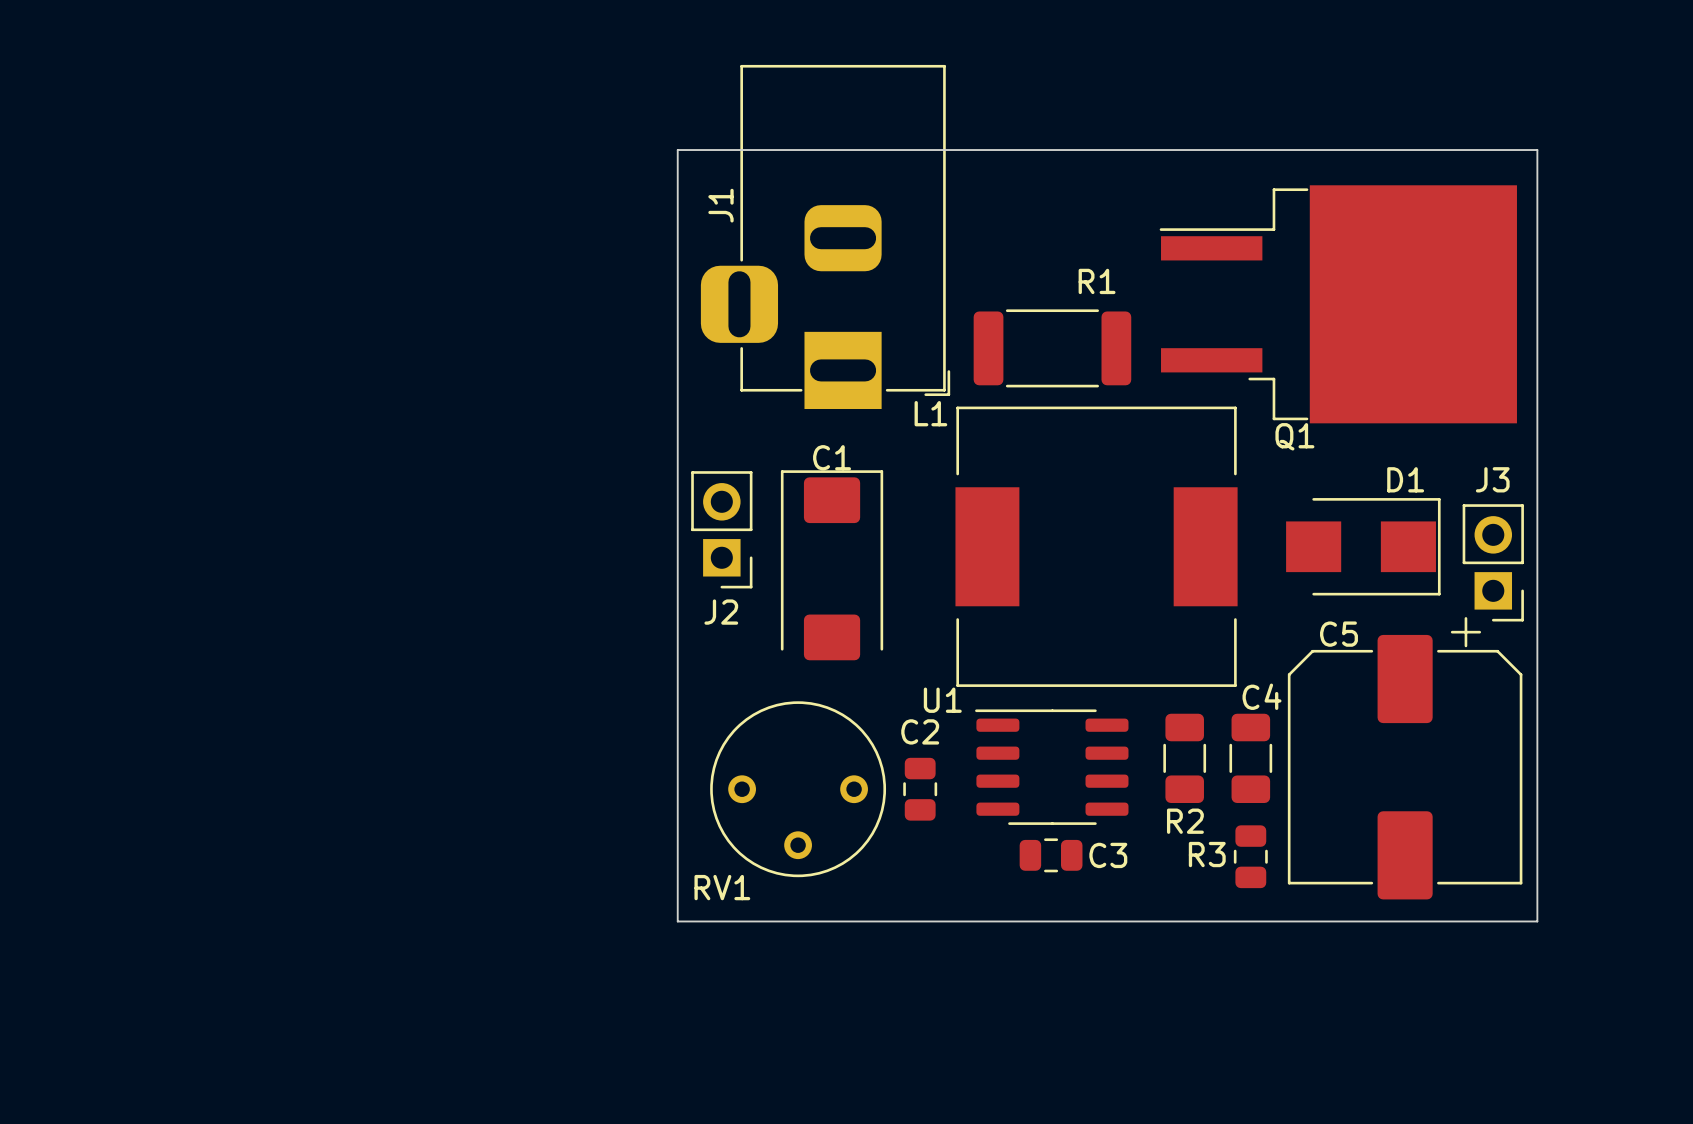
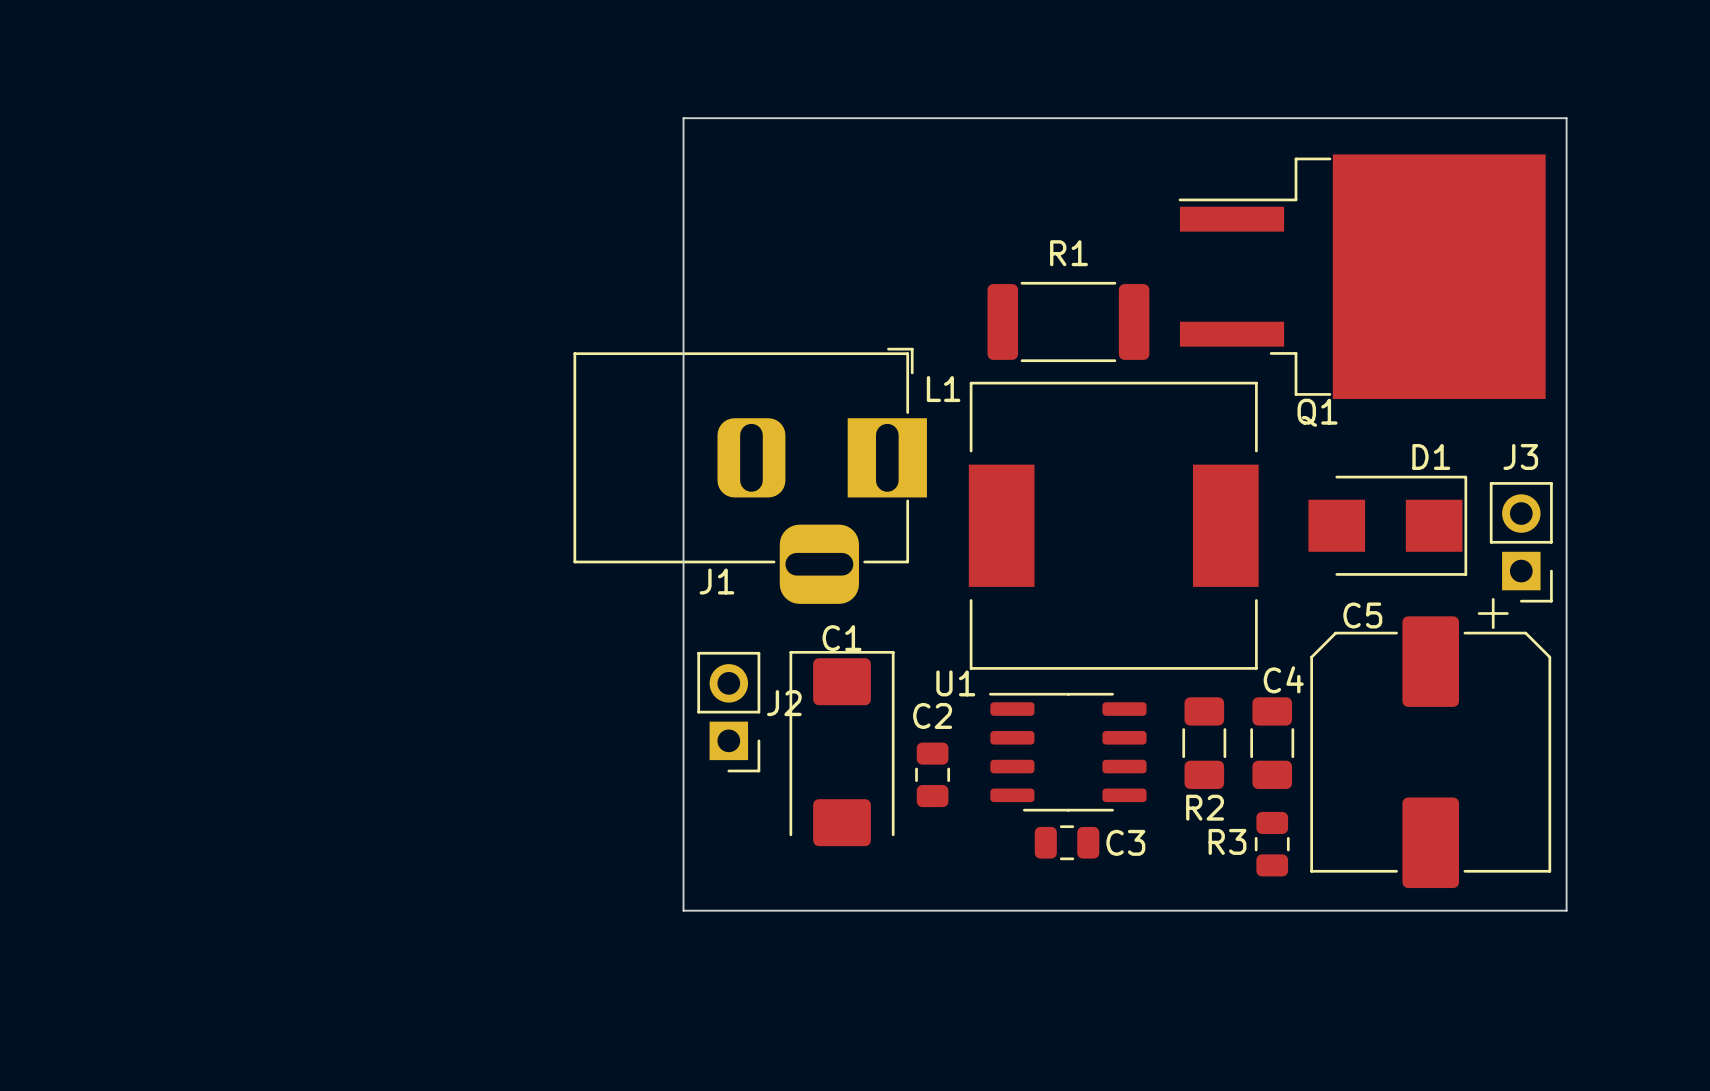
J1 rotation: 0° (825, 236) -> 90° counterclockwise (750, 475)
J1 position: (825, 236) -> (750, 475)
R1 name position: R1 (1097, 281) -> R1 (1068, 253)
J2 position: (721, 529) -> (728, 712)
C1 position: (832, 565) -> (842, 748)
J2 name position: J2 (721, 612) -> J2 (784, 703)
RV1: (798, 789) -> none

